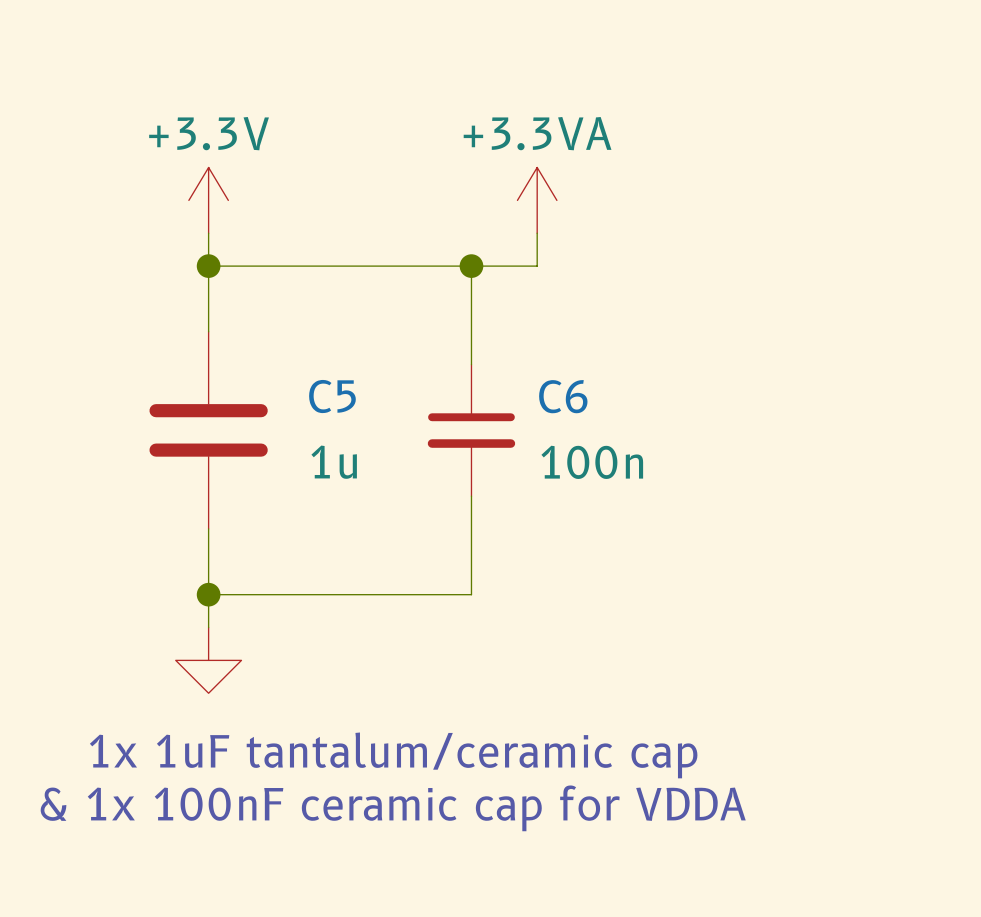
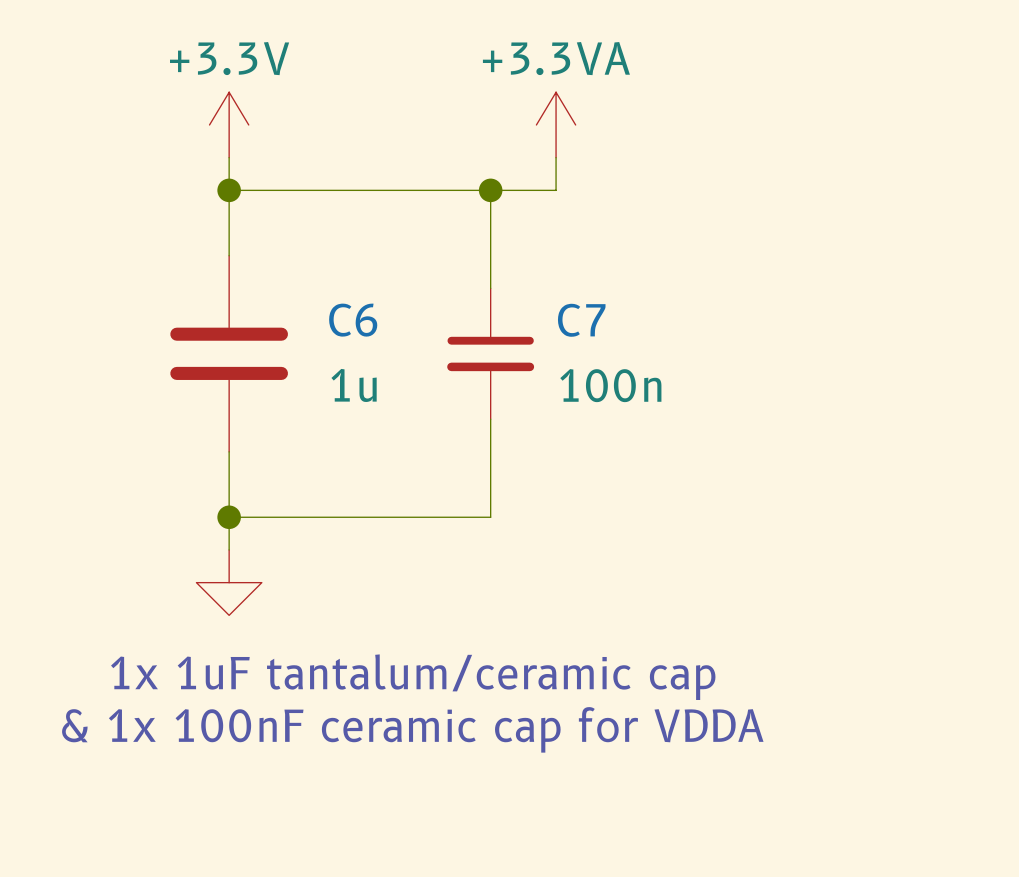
C5 name: C5 (332, 396) -> C6 (353, 320)
C6 name: C6 (563, 396) -> C7 (581, 320)

